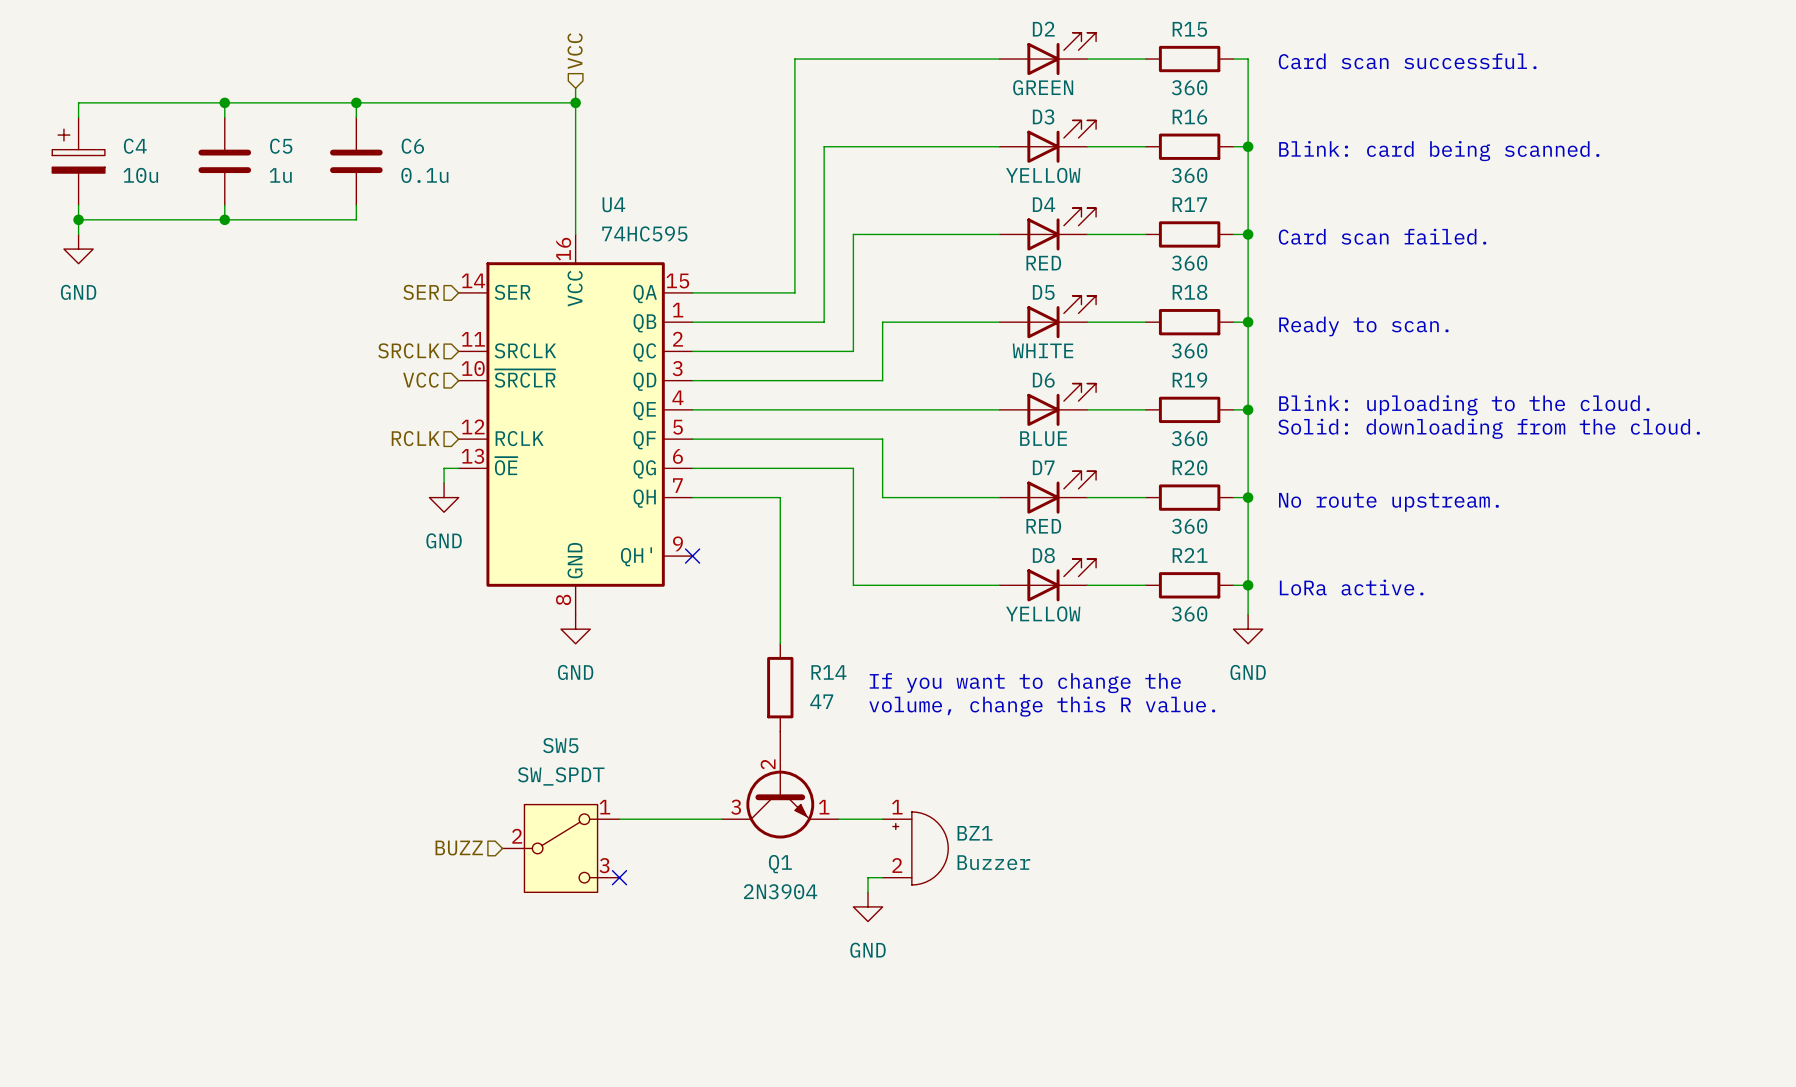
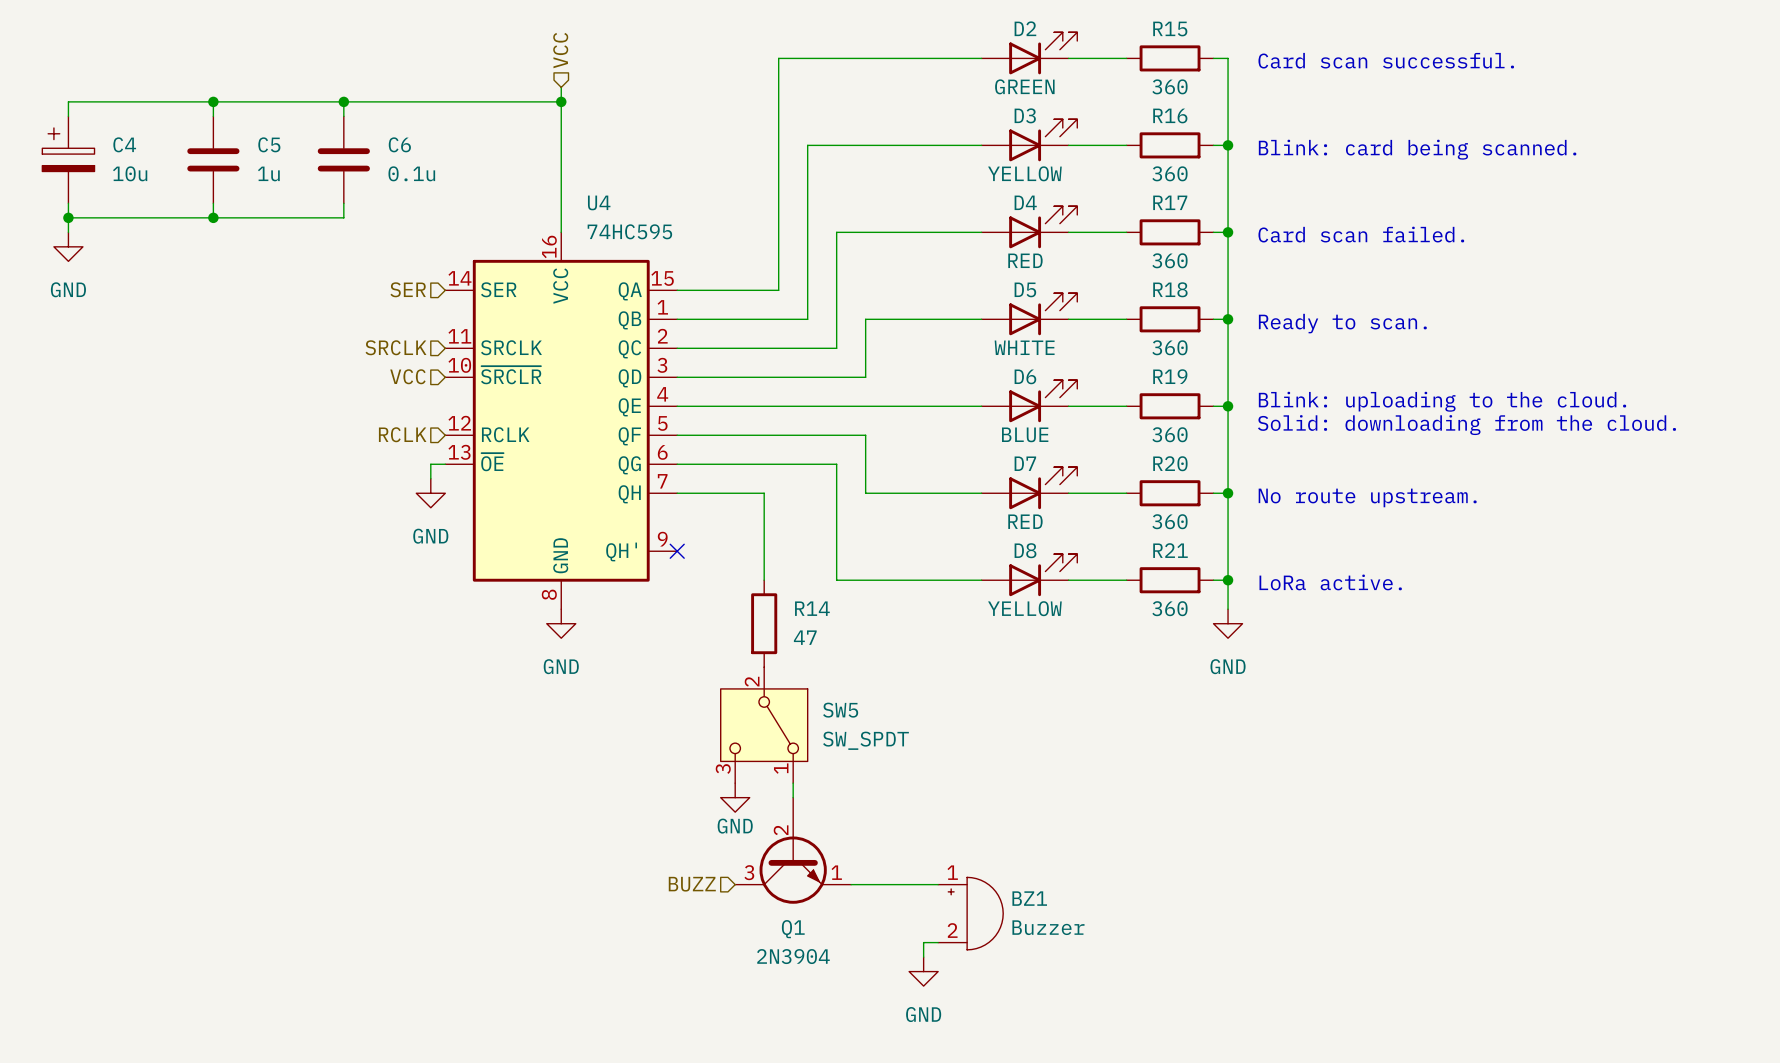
wire: (780, 585) (780, 643) -> none
text: If you want to change the (1025, 683) -> none
R14 position: (780, 687) -> (764, 623)
text: volume, change this R value. (1042, 706) -> none
SW5 value position: SW_SPDT (561, 776) -> SW_SPDT (865, 740)
Q1 position: (780, 785) -> (793, 850)
wire: none -> (793, 783) (793, 797)
power symbol: none -> GND (735, 797)
wire: (619, 819) (721, 819) -> none
wire: (838, 819) (882, 819) -> none
hierarchical label position: BUZZ (459, 848) -> BUZZ (692, 884)
SW5 rotation: 0° (561, 848) -> 90° clockwise (764, 725)
SW5 position: (561, 848) -> (764, 725)
BZ1 position: (915, 848) -> (970, 913)
no-connect mark: (619, 877) -> none
wire: (882, 877) (868, 877) (868, 892) -> (938, 884) (851, 884)
power symbol: GND (868, 906) -> none
wire: none -> (938, 942) (923, 942) (923, 957)
power symbol: none -> GND (923, 971)

